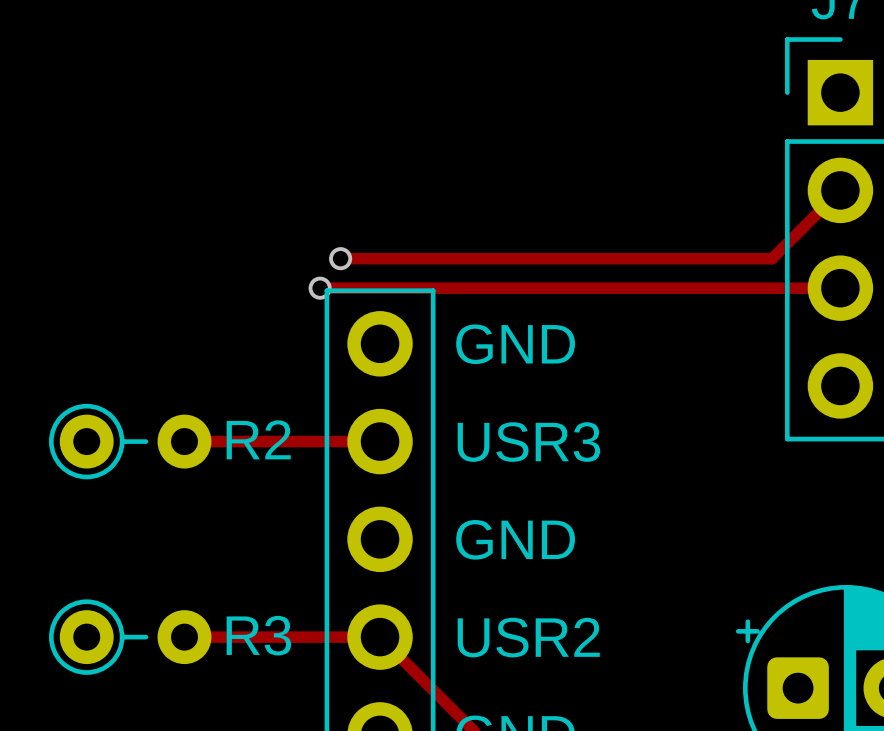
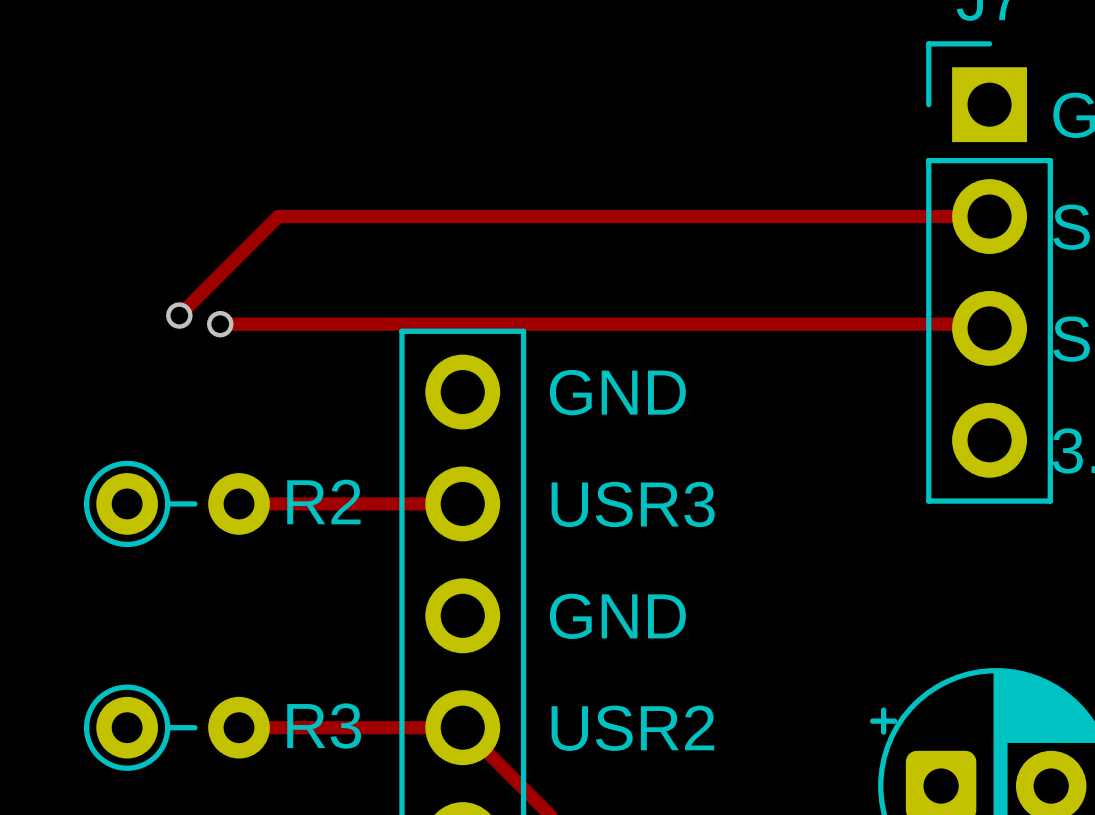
track: (840, 190) (772, 258) (340, 258) -> (989, 216) (278, 216) (179, 315)
via: (340, 258) -> none
via: none -> (179, 315)
via: none -> (220, 324)
track: (320, 288) (840, 288) -> (220, 324) (985, 324) (989, 328)
via: (320, 288) -> none

